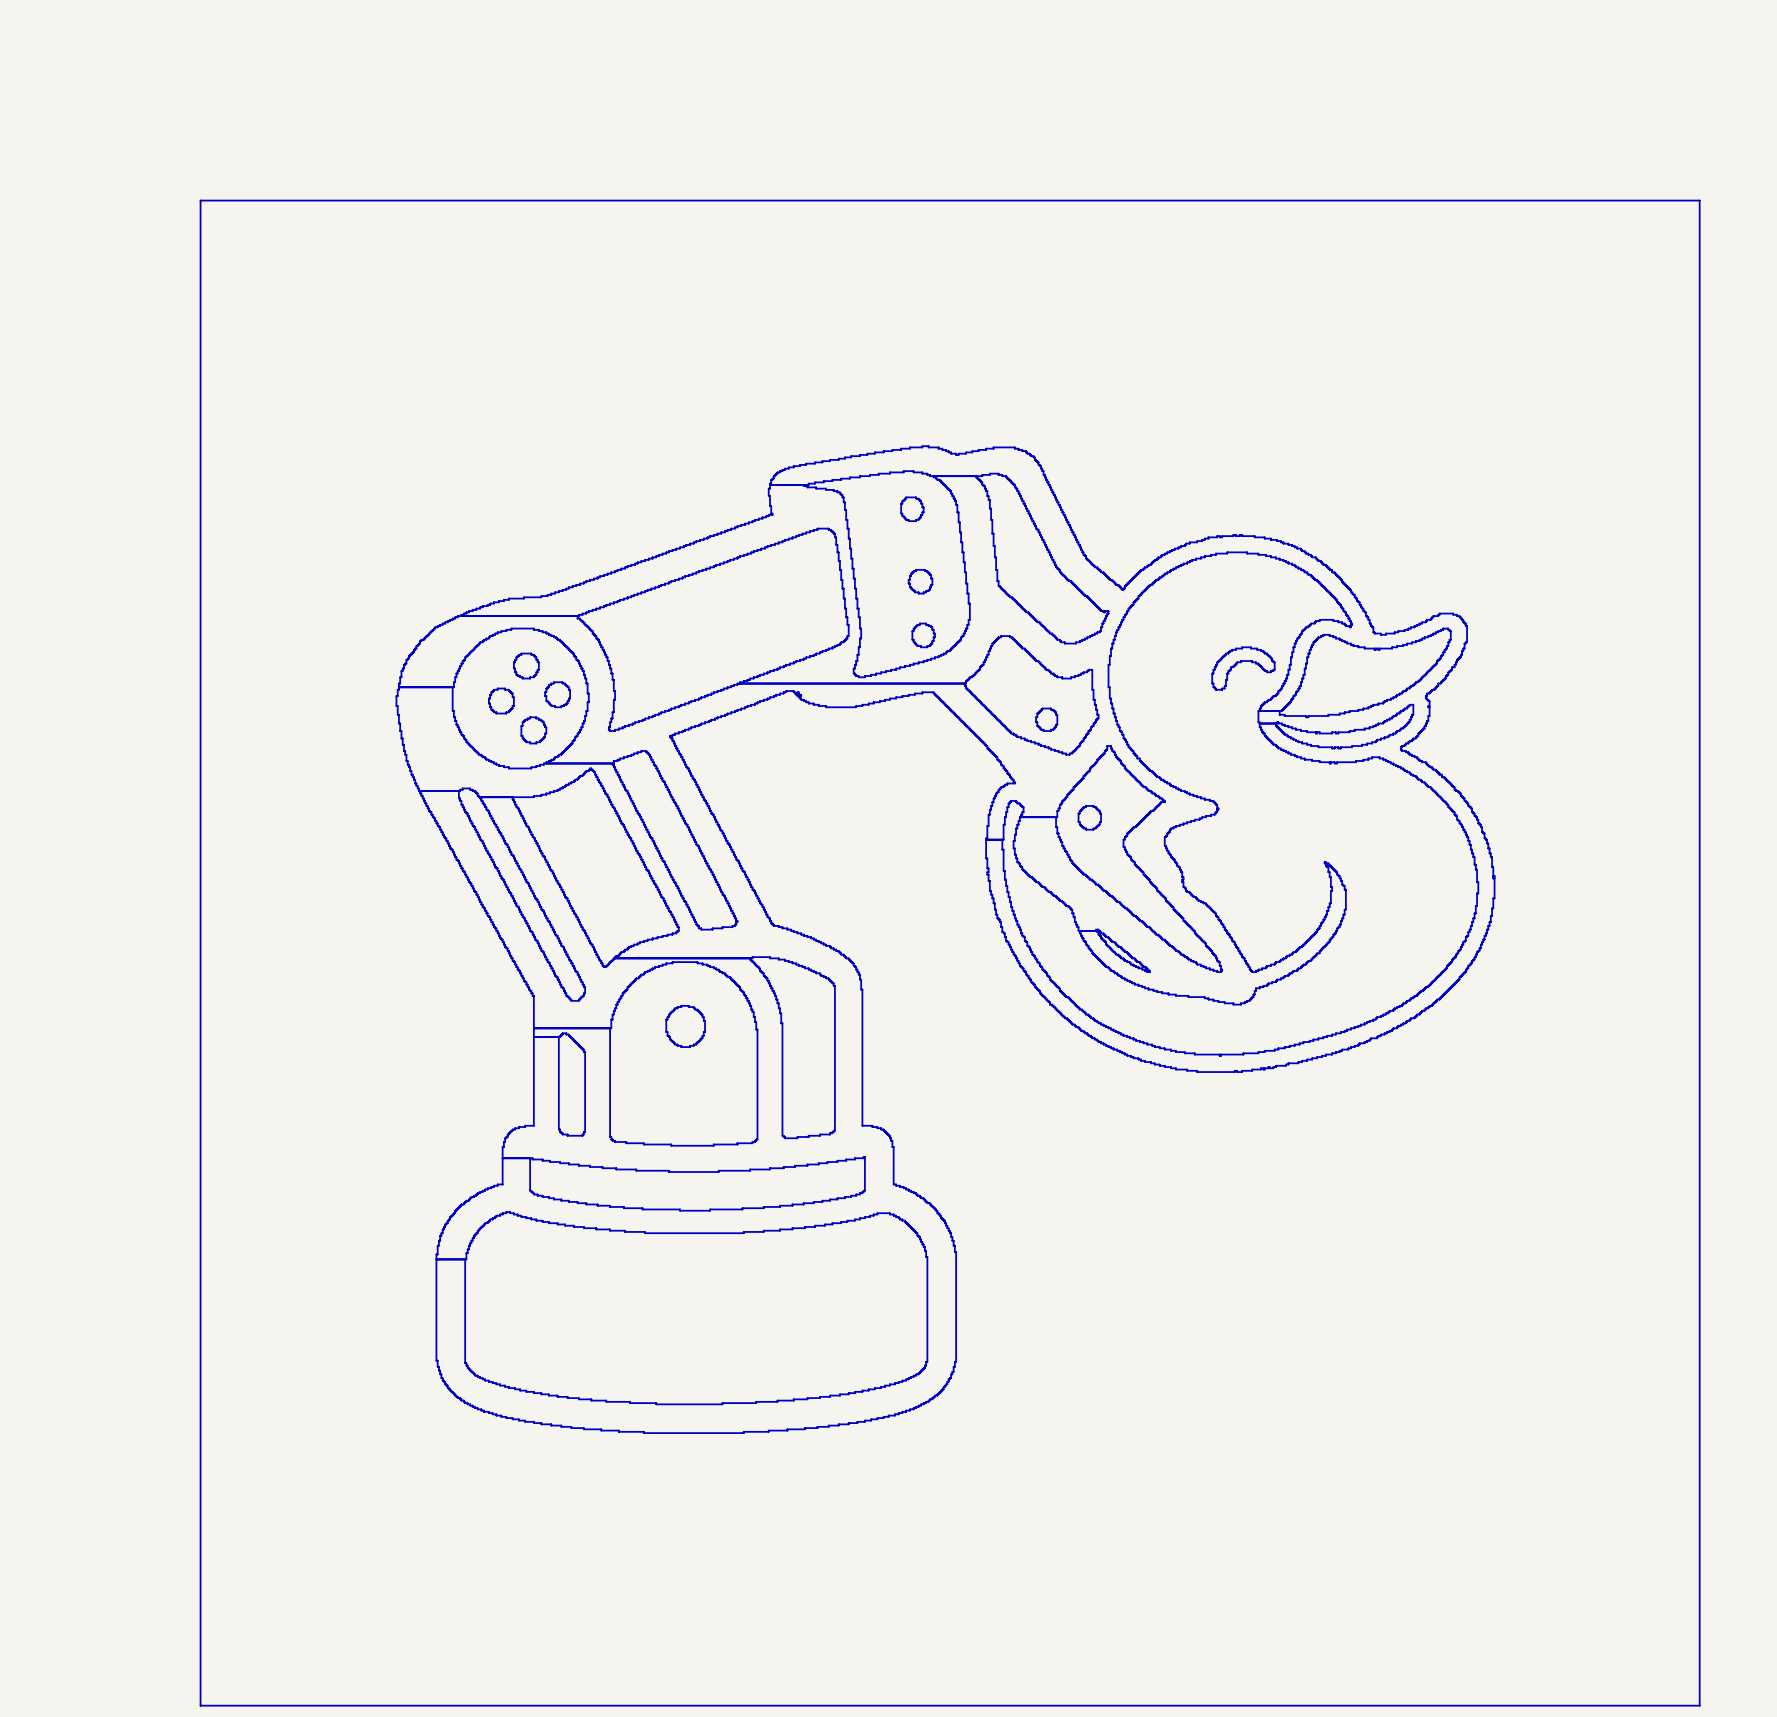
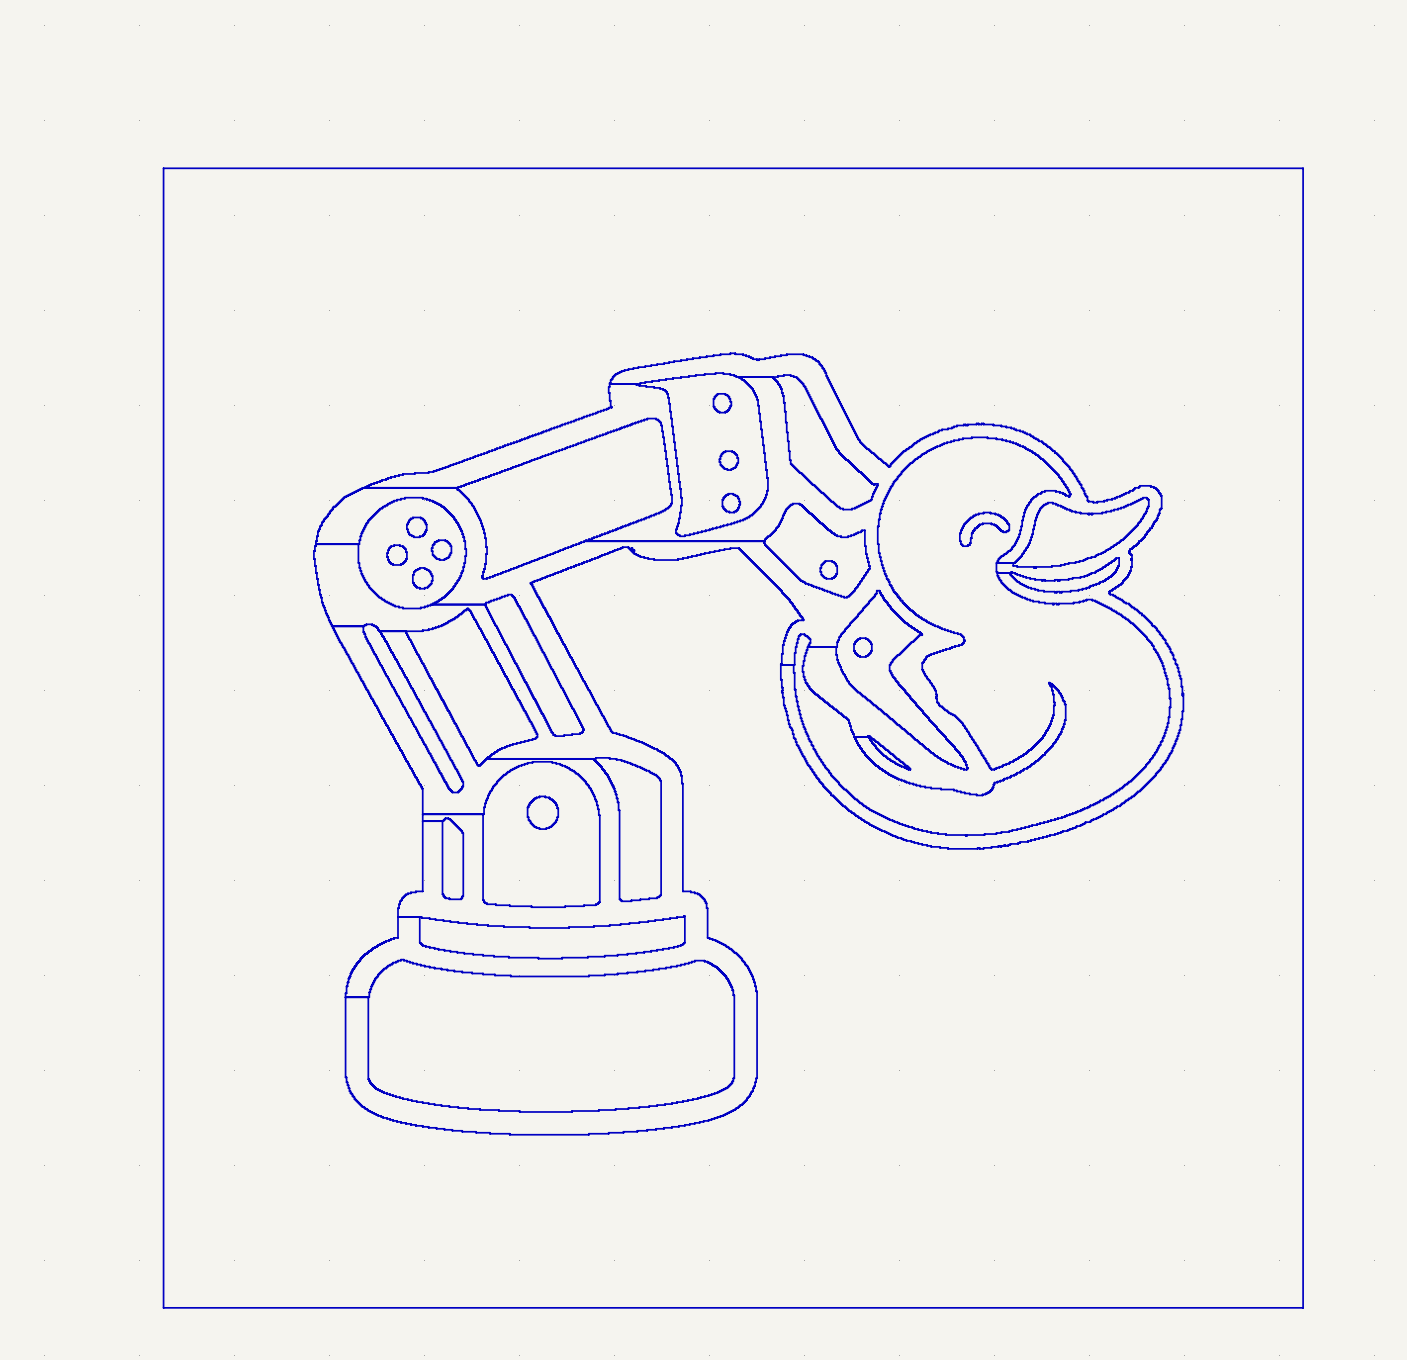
line: (200, 200) (1699, 200) (1699, 1705) (200, 1705) (200, 200) -> (163, 168) (163, 1307) (1303, 1307) (1303, 168) (163, 168)

